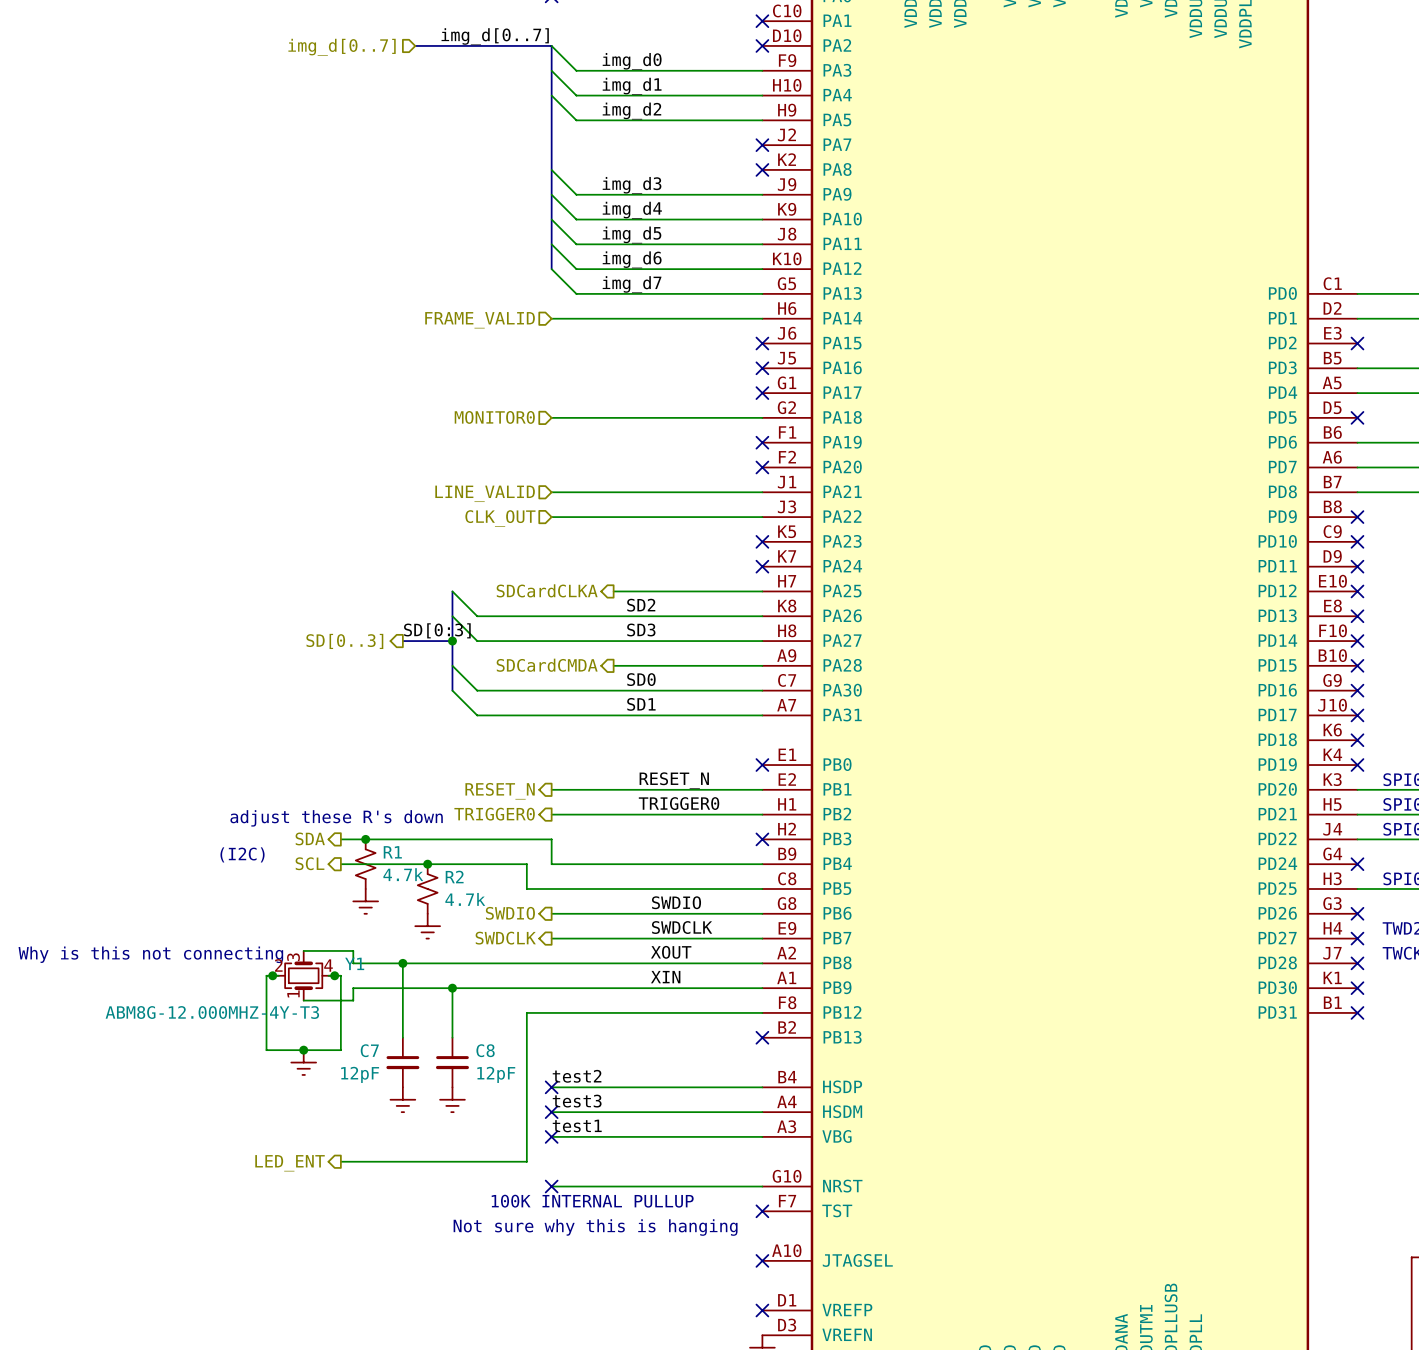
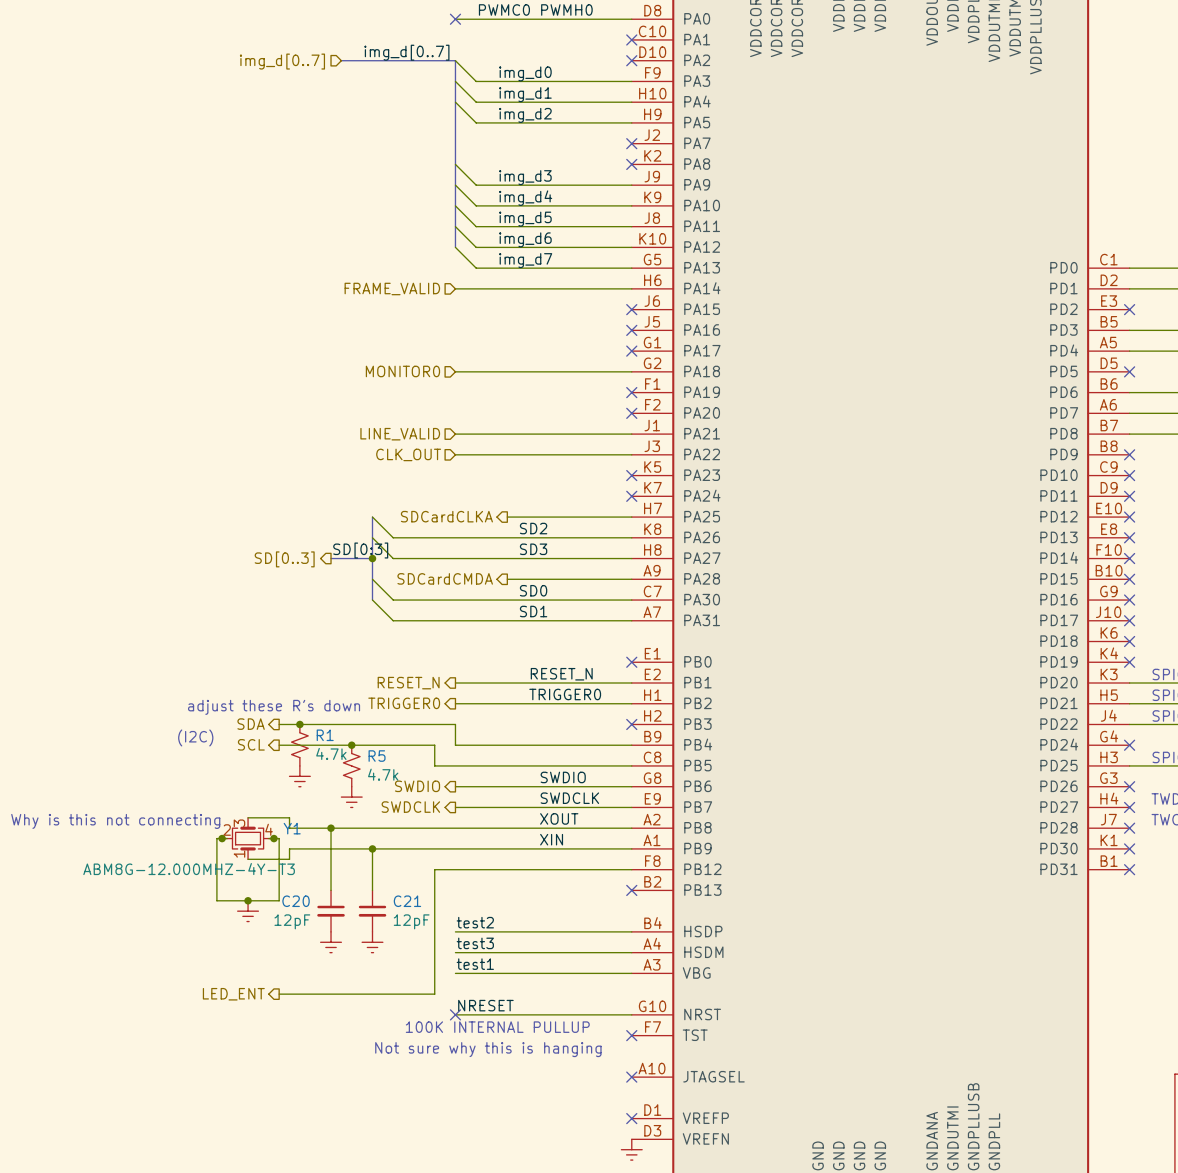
R2 name: R2 (454, 877) -> R5 (377, 756)
C7 name: C7 (369, 1050) -> C20 (296, 901)
C8 name: C8 (485, 1050) -> C21 (407, 901)
no-connect mark: (551, 1087) -> none
no-connect mark: (551, 1112) -> none
no-connect mark: (551, 1136) -> none
label: none -> NRESET (485, 1005)

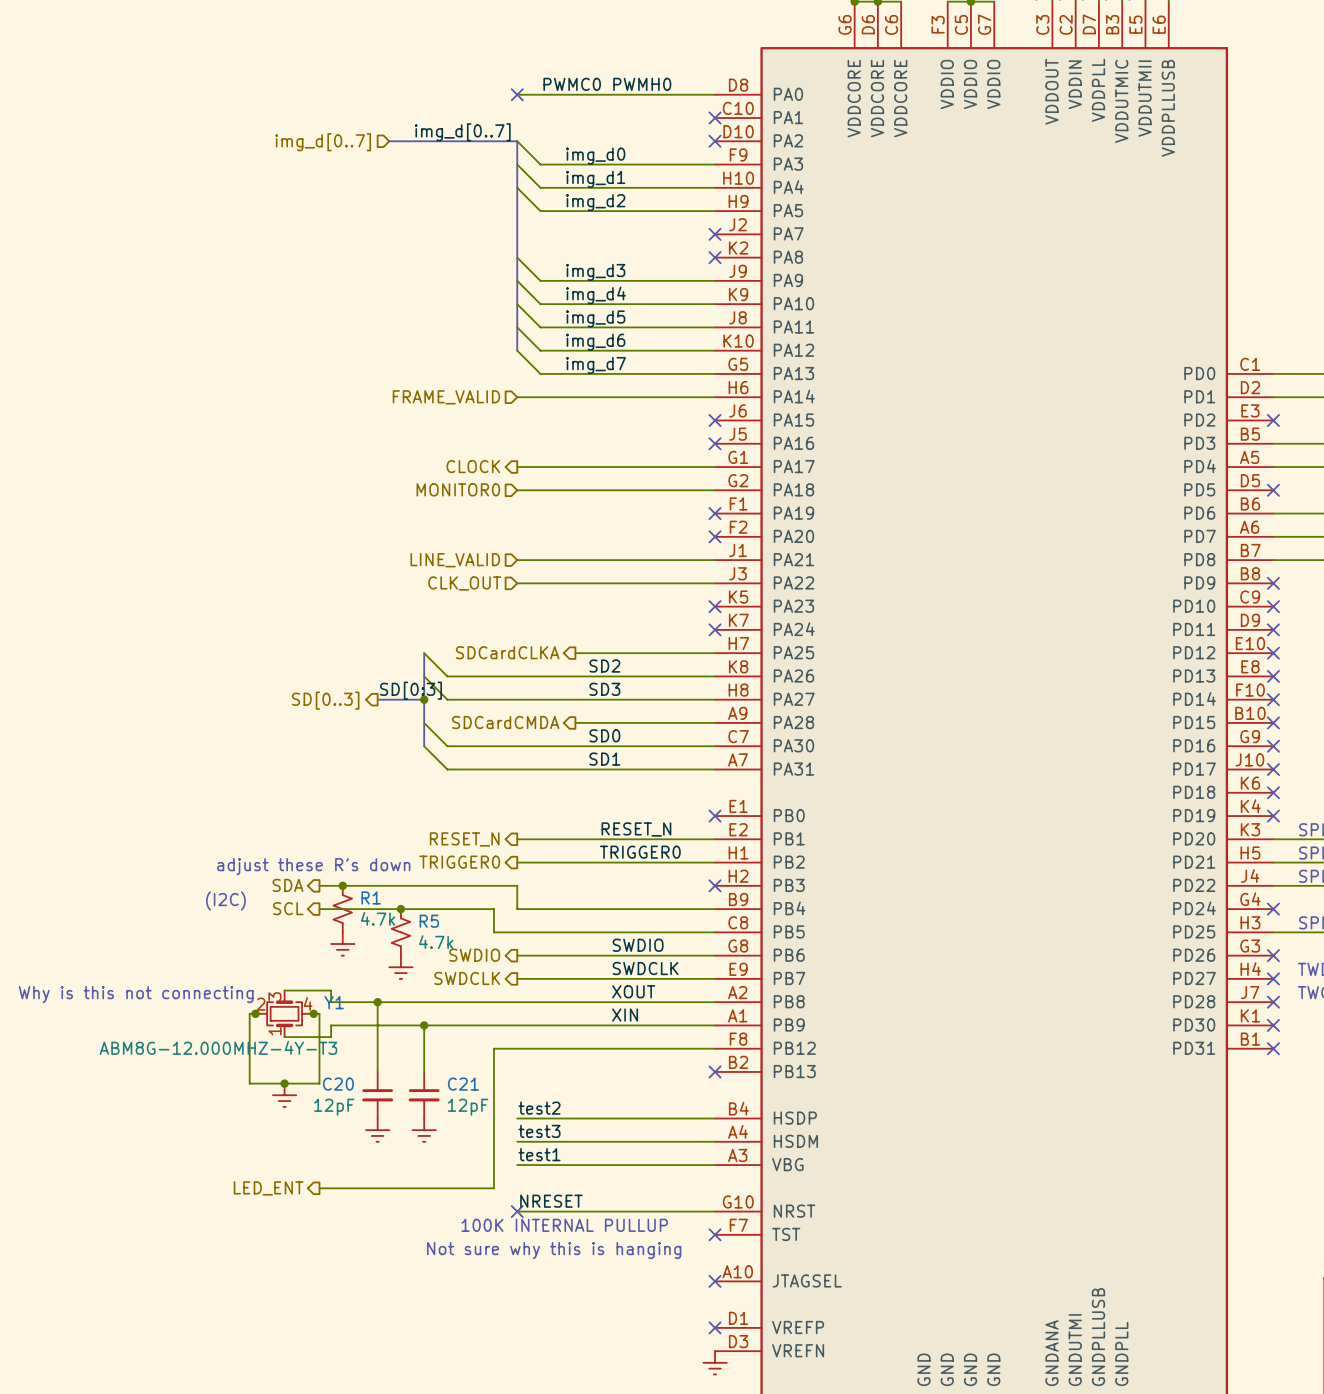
hierarchical label: none -> CLOCK (473, 466)
wire: none -> (517, 467) (715, 467)
no-connect mark: (631, 351) -> none

